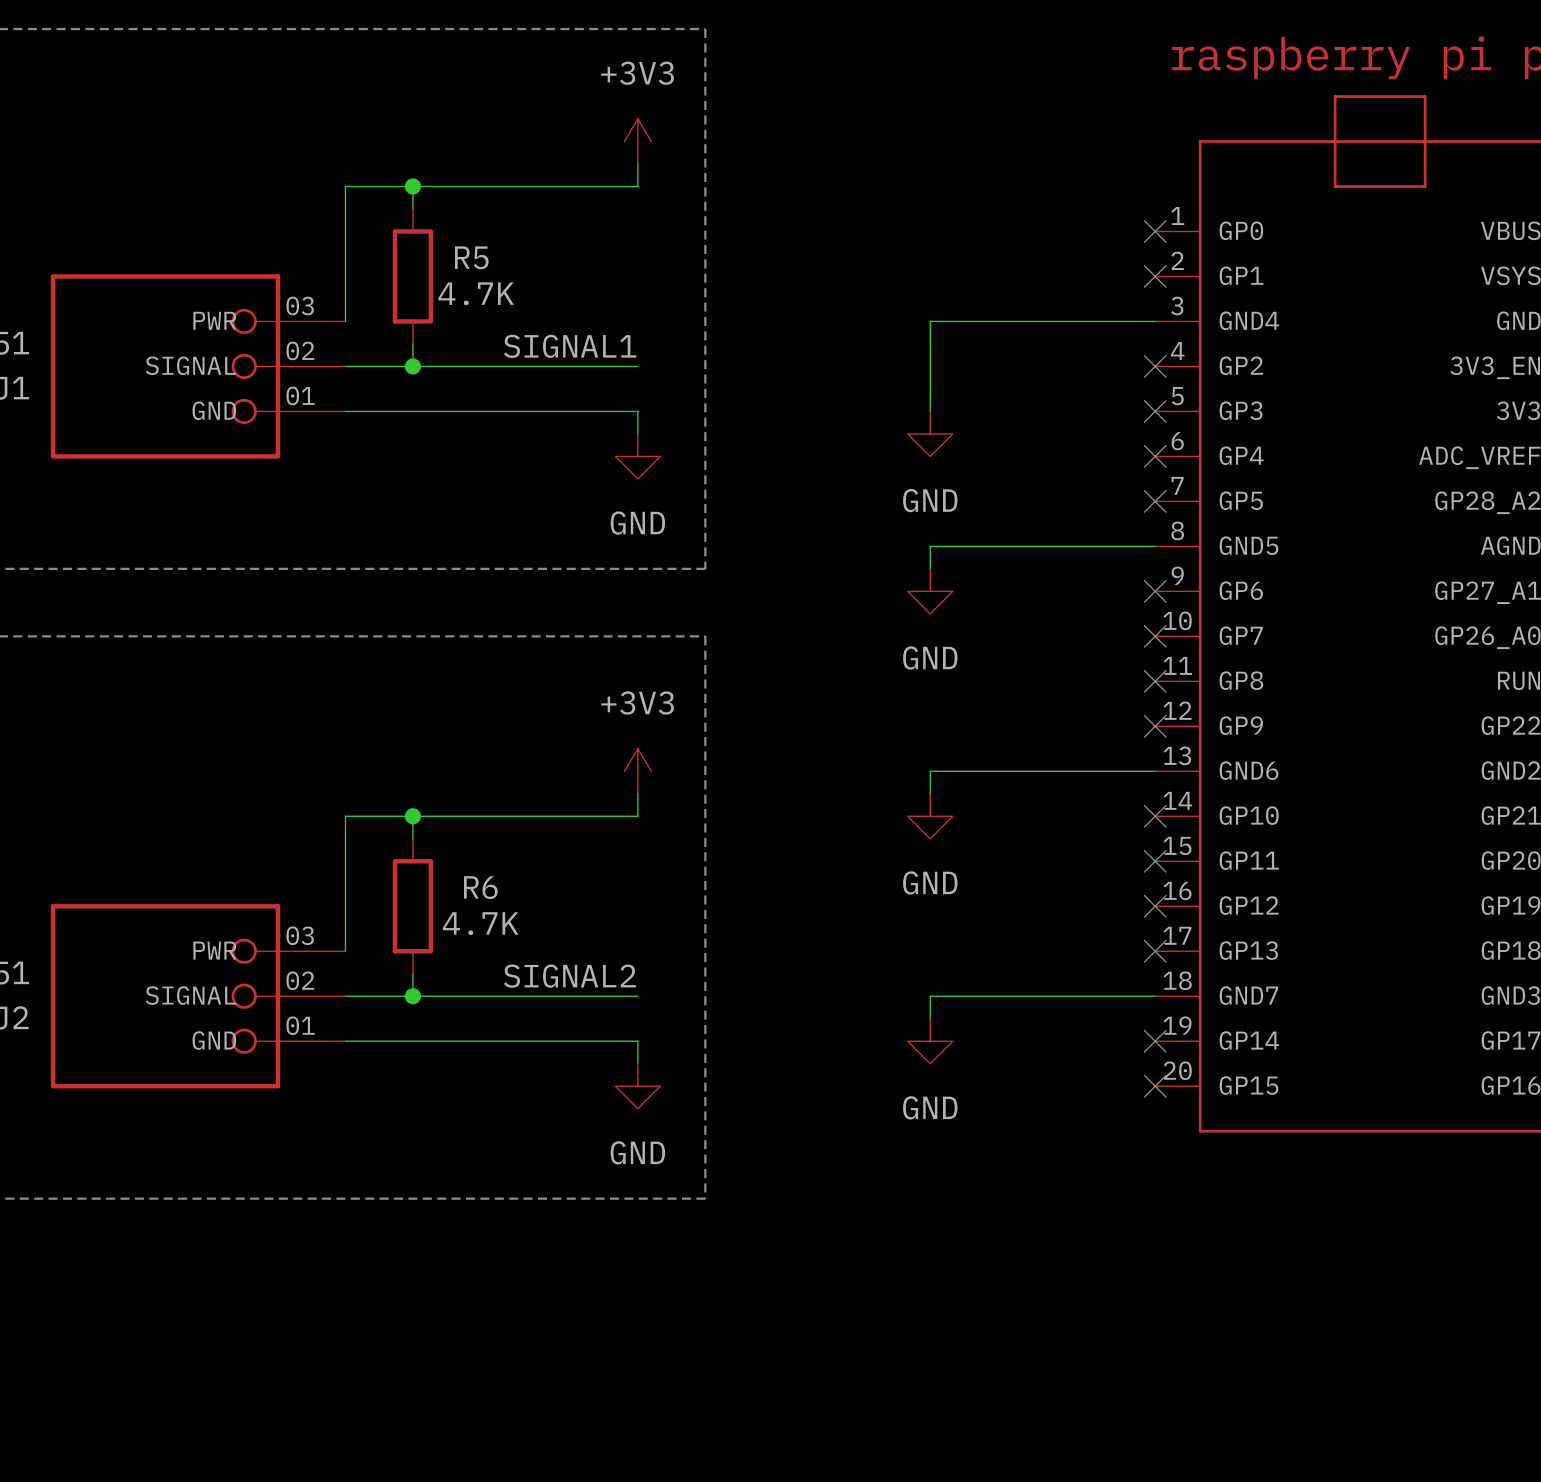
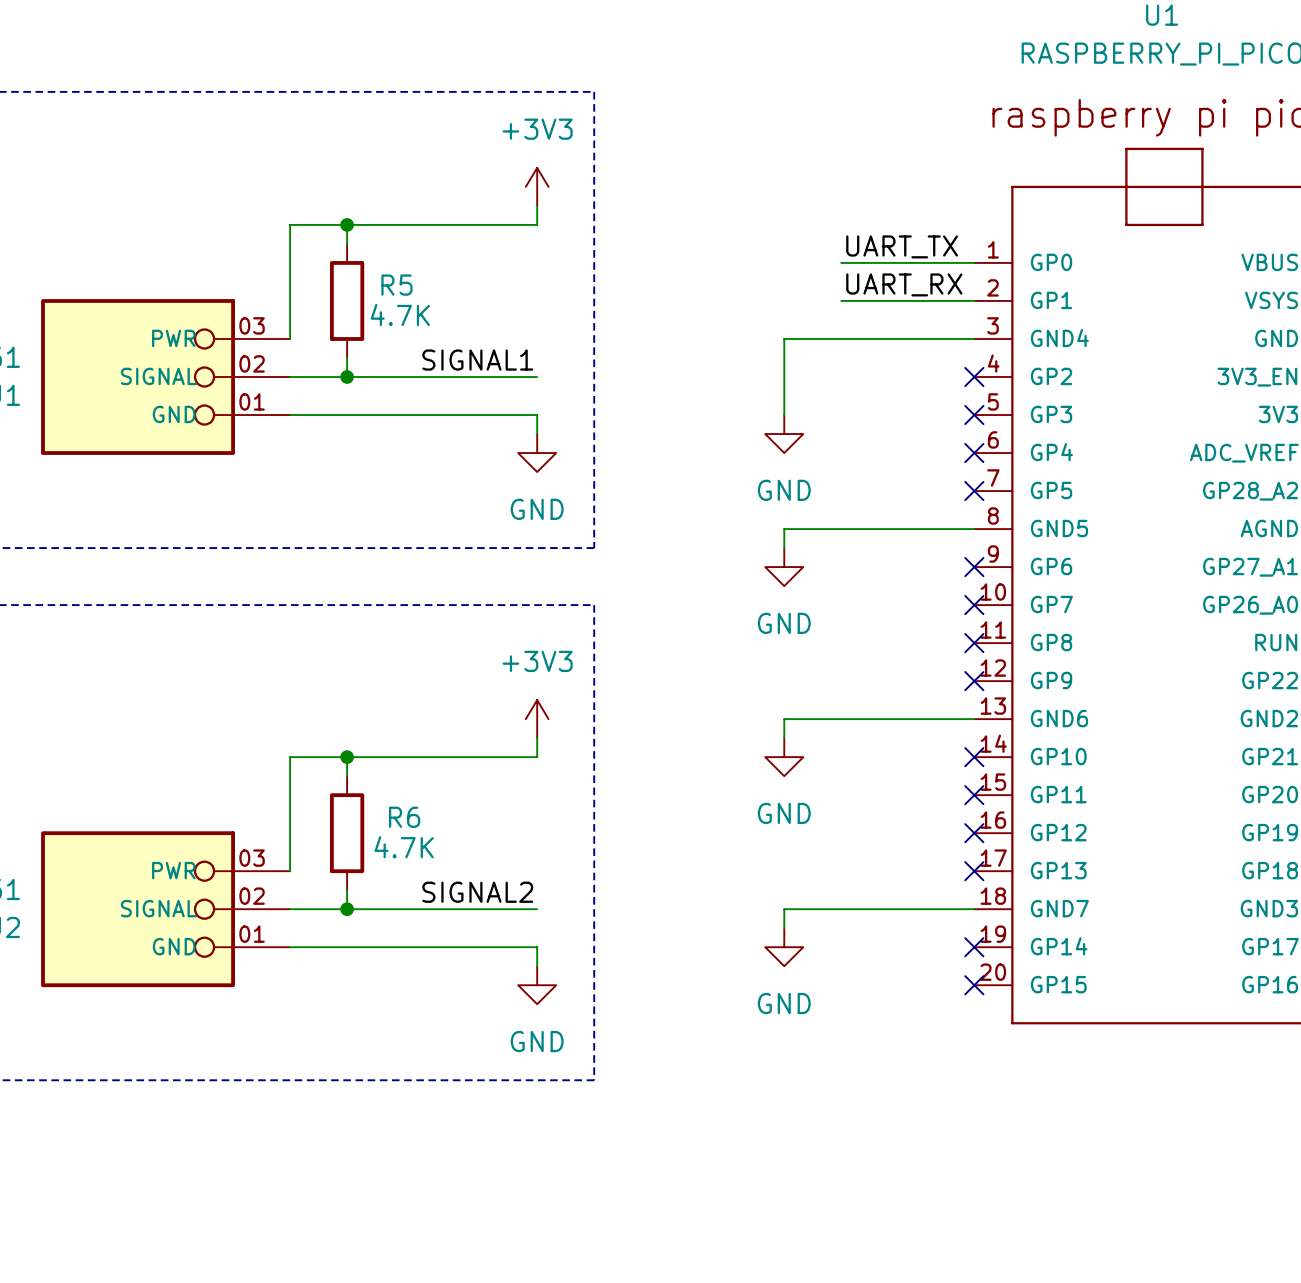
label: none -> UART_TX (902, 246)
wire: none -> (841, 262) (974, 262)
no-connect mark: (1155, 231) -> none
label: none -> UART_RX (904, 284)
wire: none -> (841, 300) (974, 300)
no-connect mark: (1155, 276) -> none

